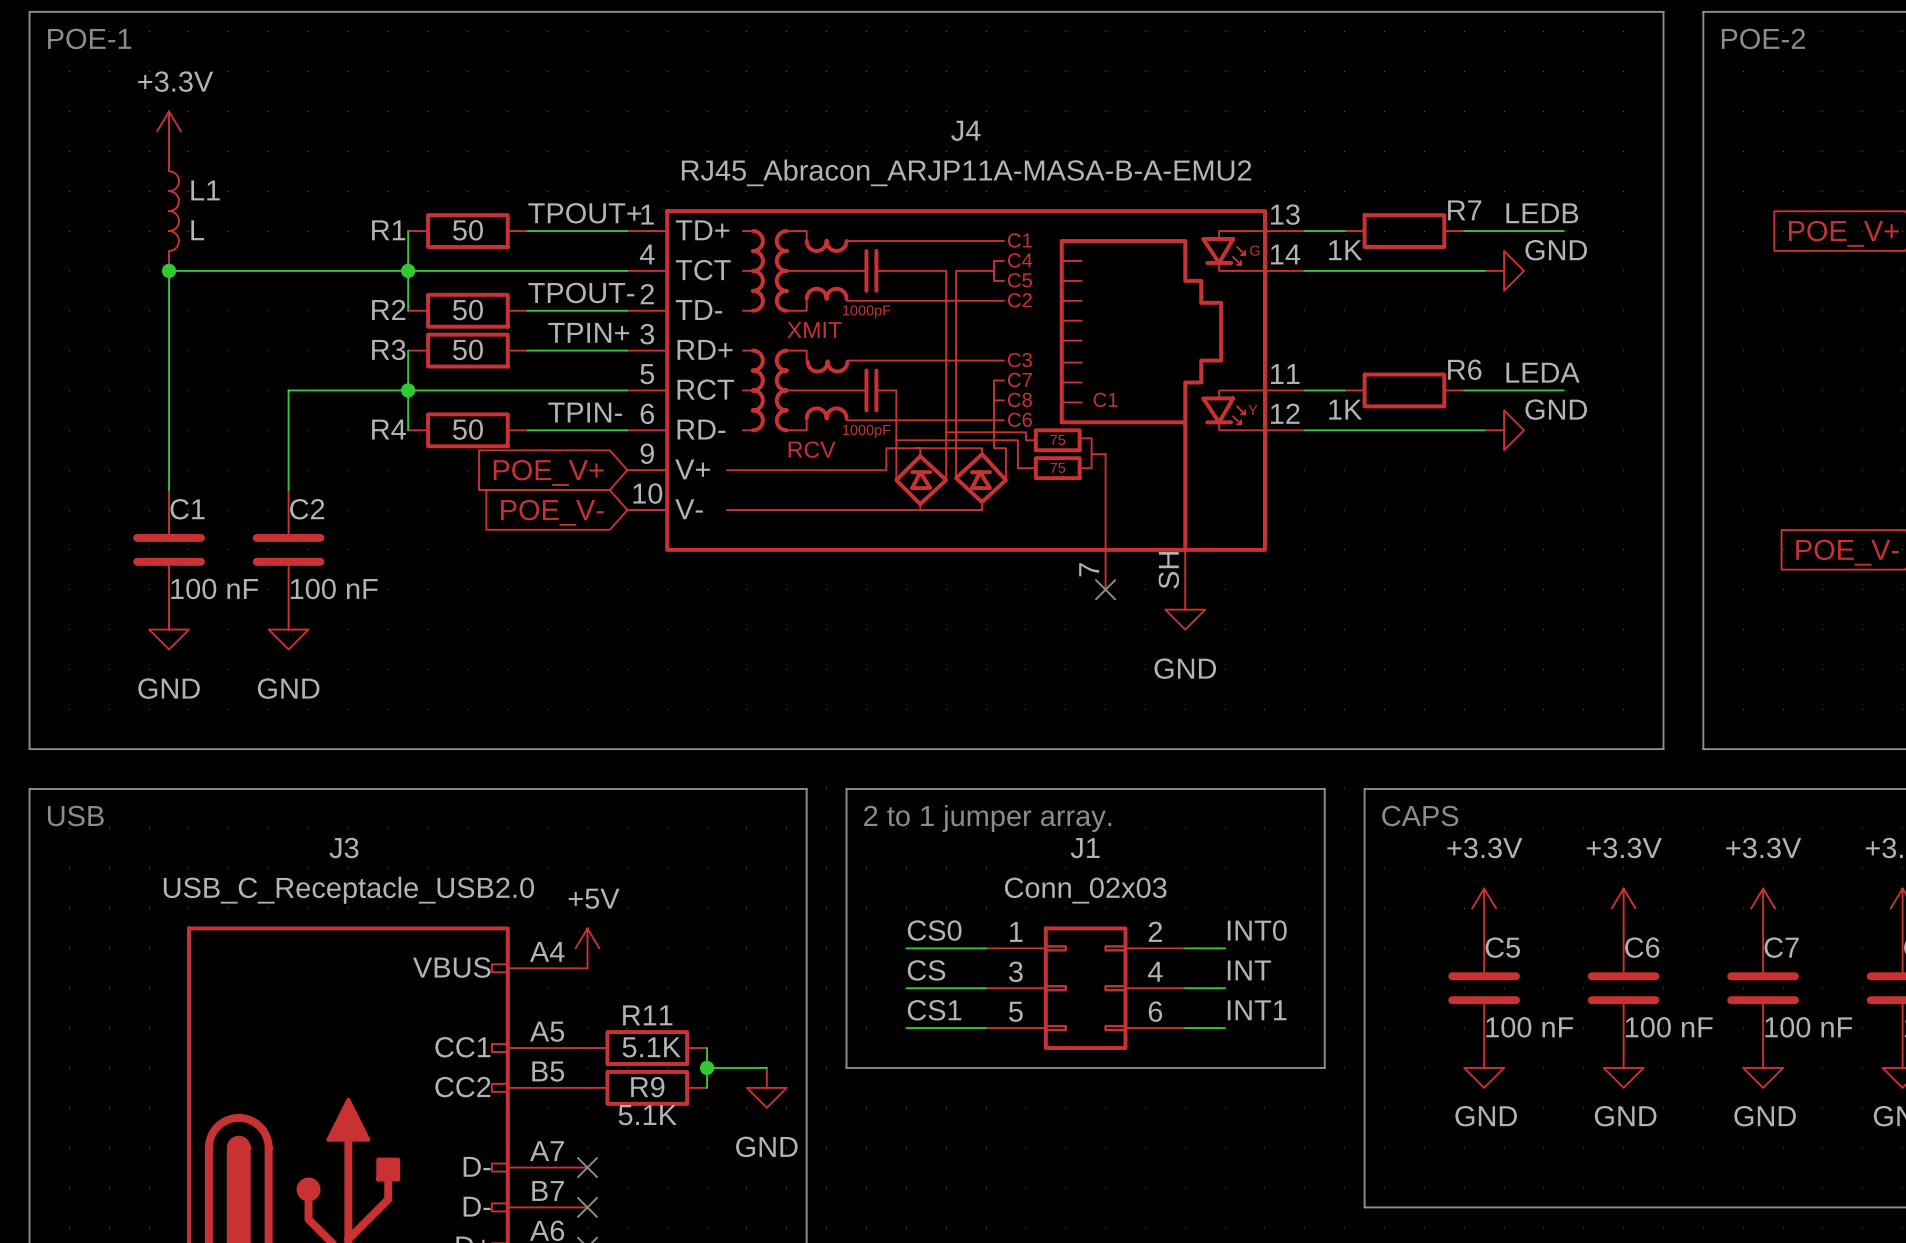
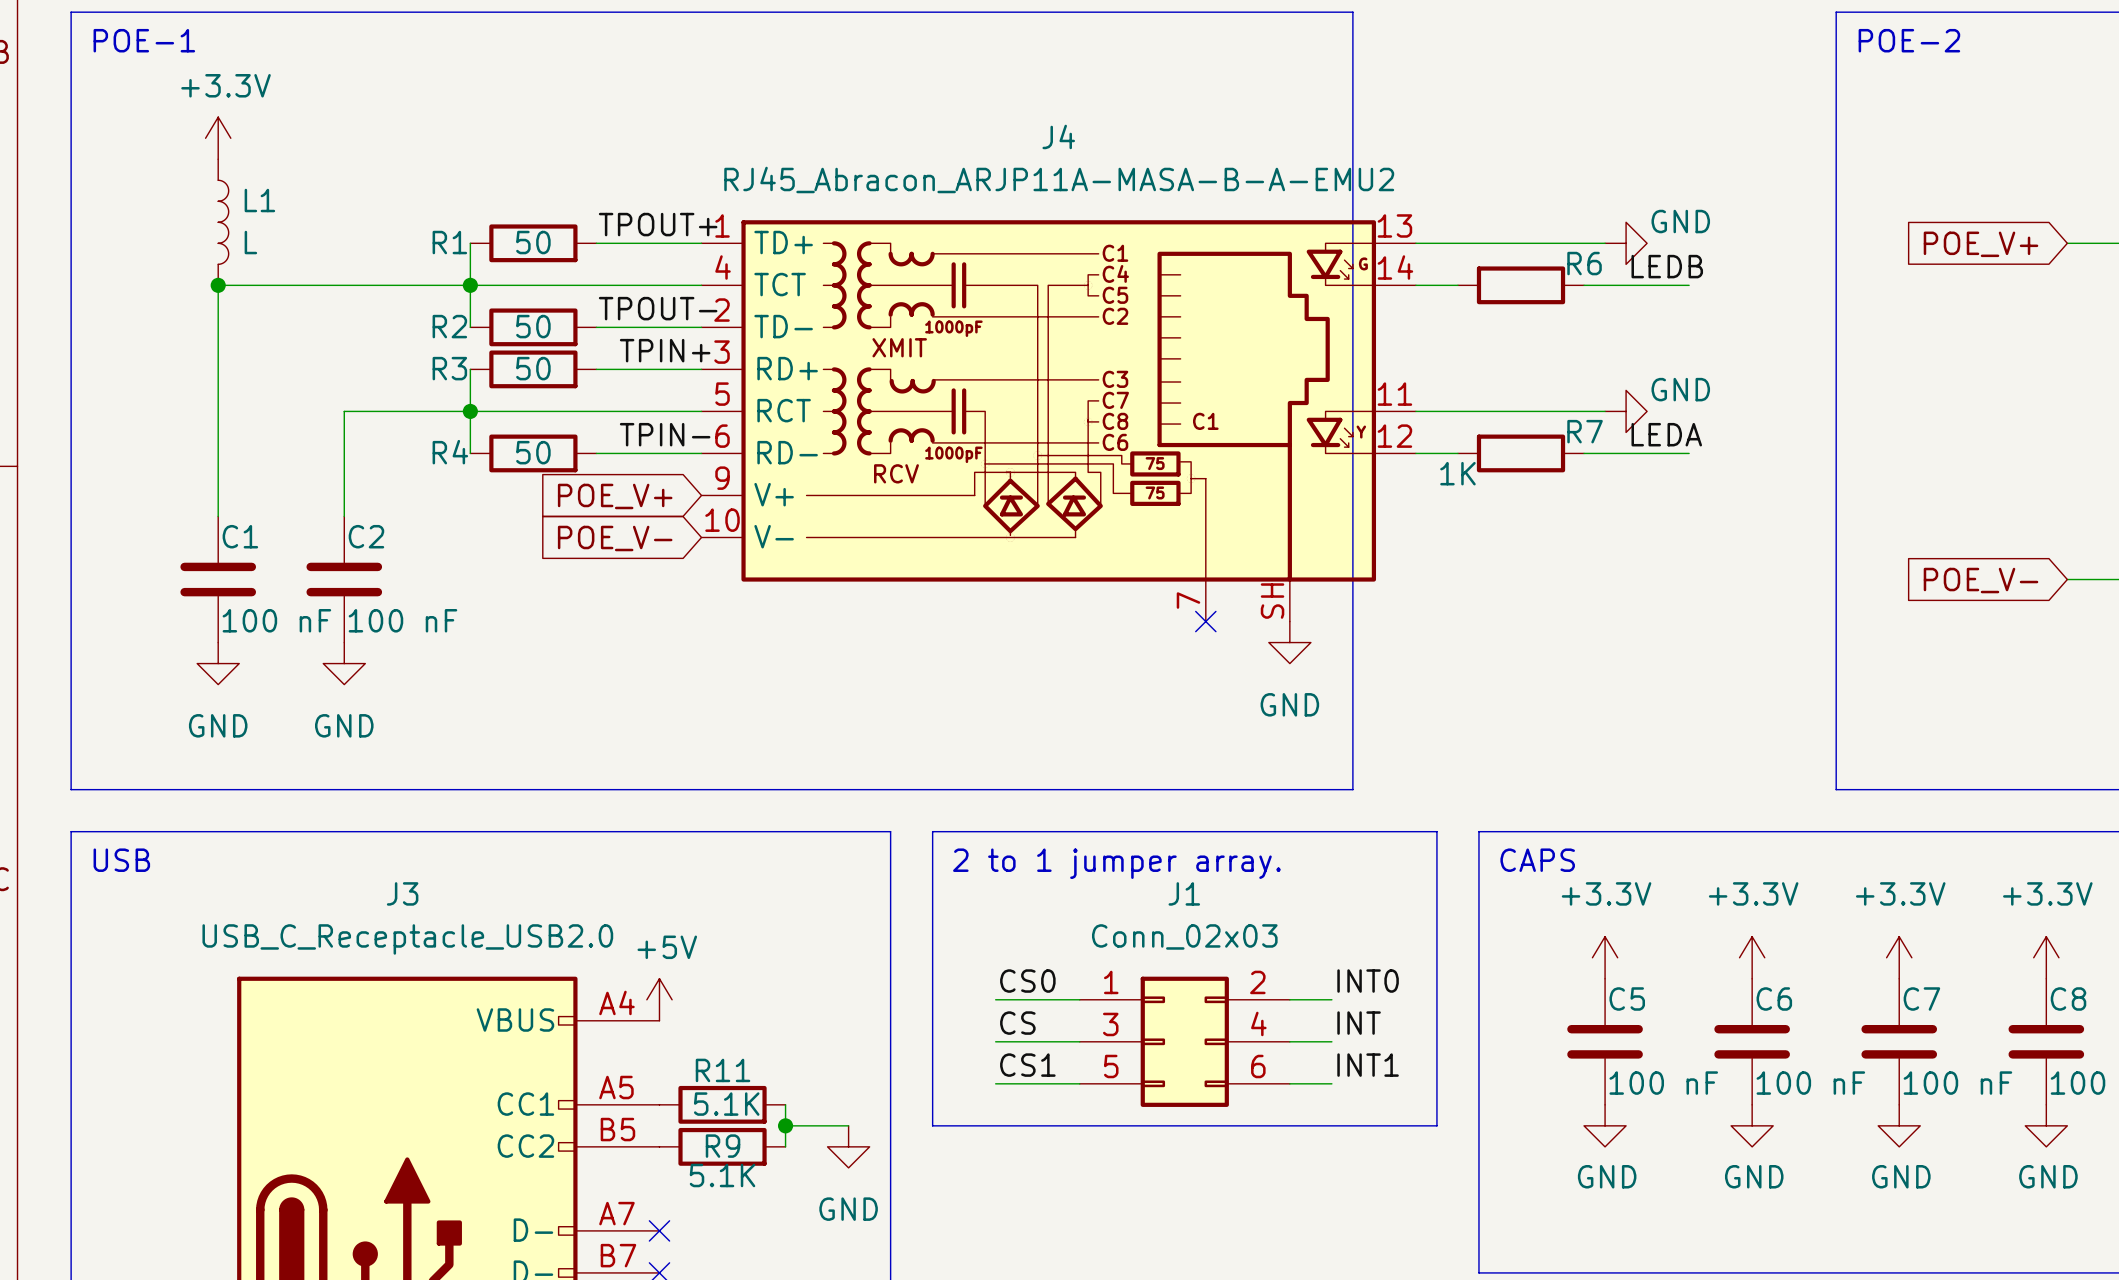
line: (1245, 11) (1663, 11) (1663, 749) (1245, 749) -> (1352, 12) (1352, 789)
label position: LEDB (1542, 213) -> LEDB (1667, 266)
R7 position: (1404, 231) -> (1521, 453)
wire: (1484, 231) (1563, 231) -> (1605, 285) (1689, 285)
wire: (1344, 270) (1464, 270) -> (1457, 243) (1584, 243)
power symbol position: GND (1504, 270) -> GND (1626, 243)
label position: LEDA (1543, 372) -> LEDA (1666, 434)
R6 position: (1404, 390) -> (1521, 285)
wire: (1484, 390) (1563, 390) -> (1605, 453) (1689, 453)
R6 value: 1K (1345, 409) -> none
wire: (1344, 430) (1464, 430) -> (1457, 411) (1584, 411)
power symbol position: GND (1504, 430) -> GND (1626, 411)

